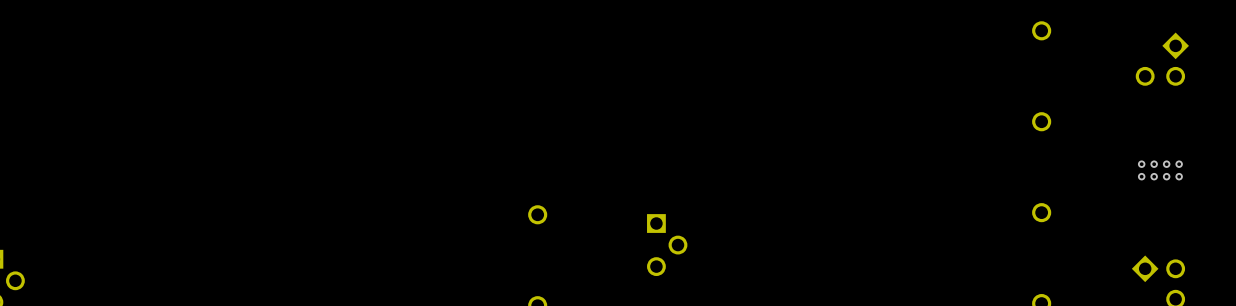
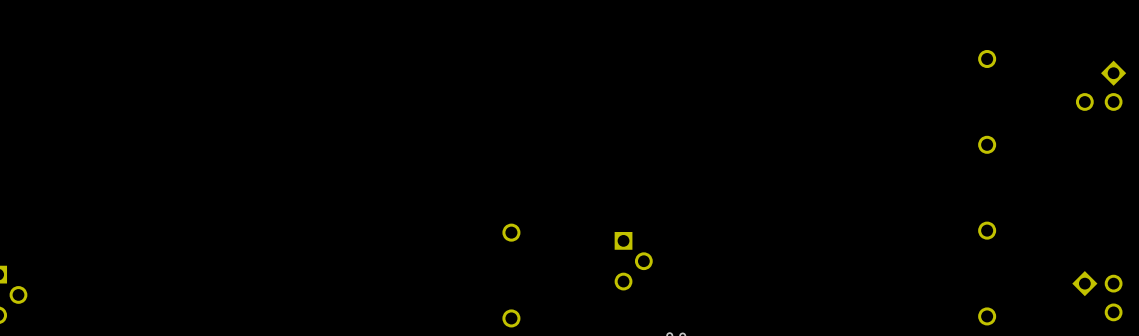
via: (1141, 164) -> none
via: (1154, 164) -> none
via: (1166, 164) -> none
via: (1179, 164) -> none
via: (1141, 176) -> none
via: (1154, 176) -> none
via: (1166, 176) -> none
via: (1179, 176) -> none

